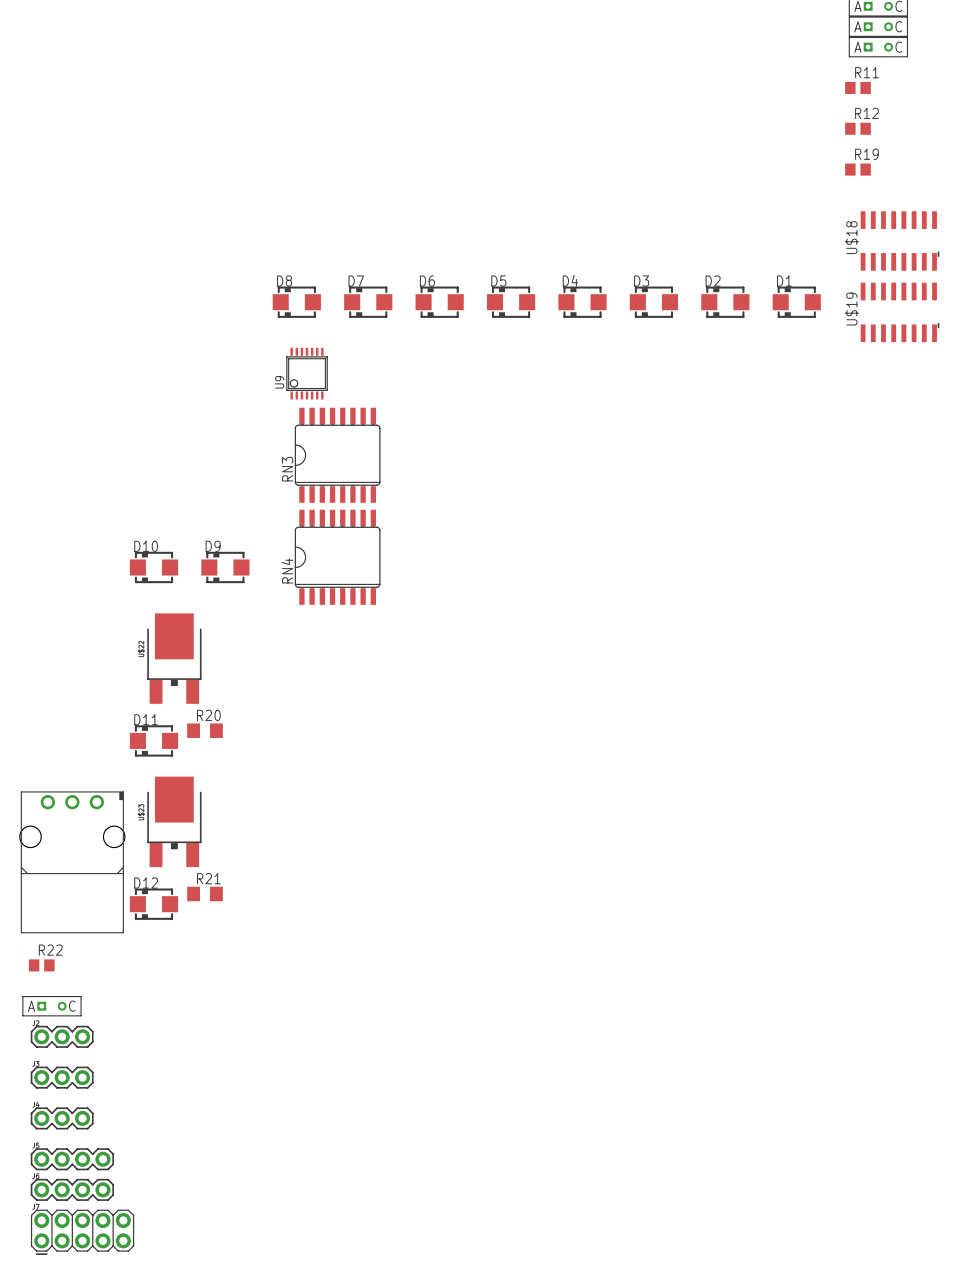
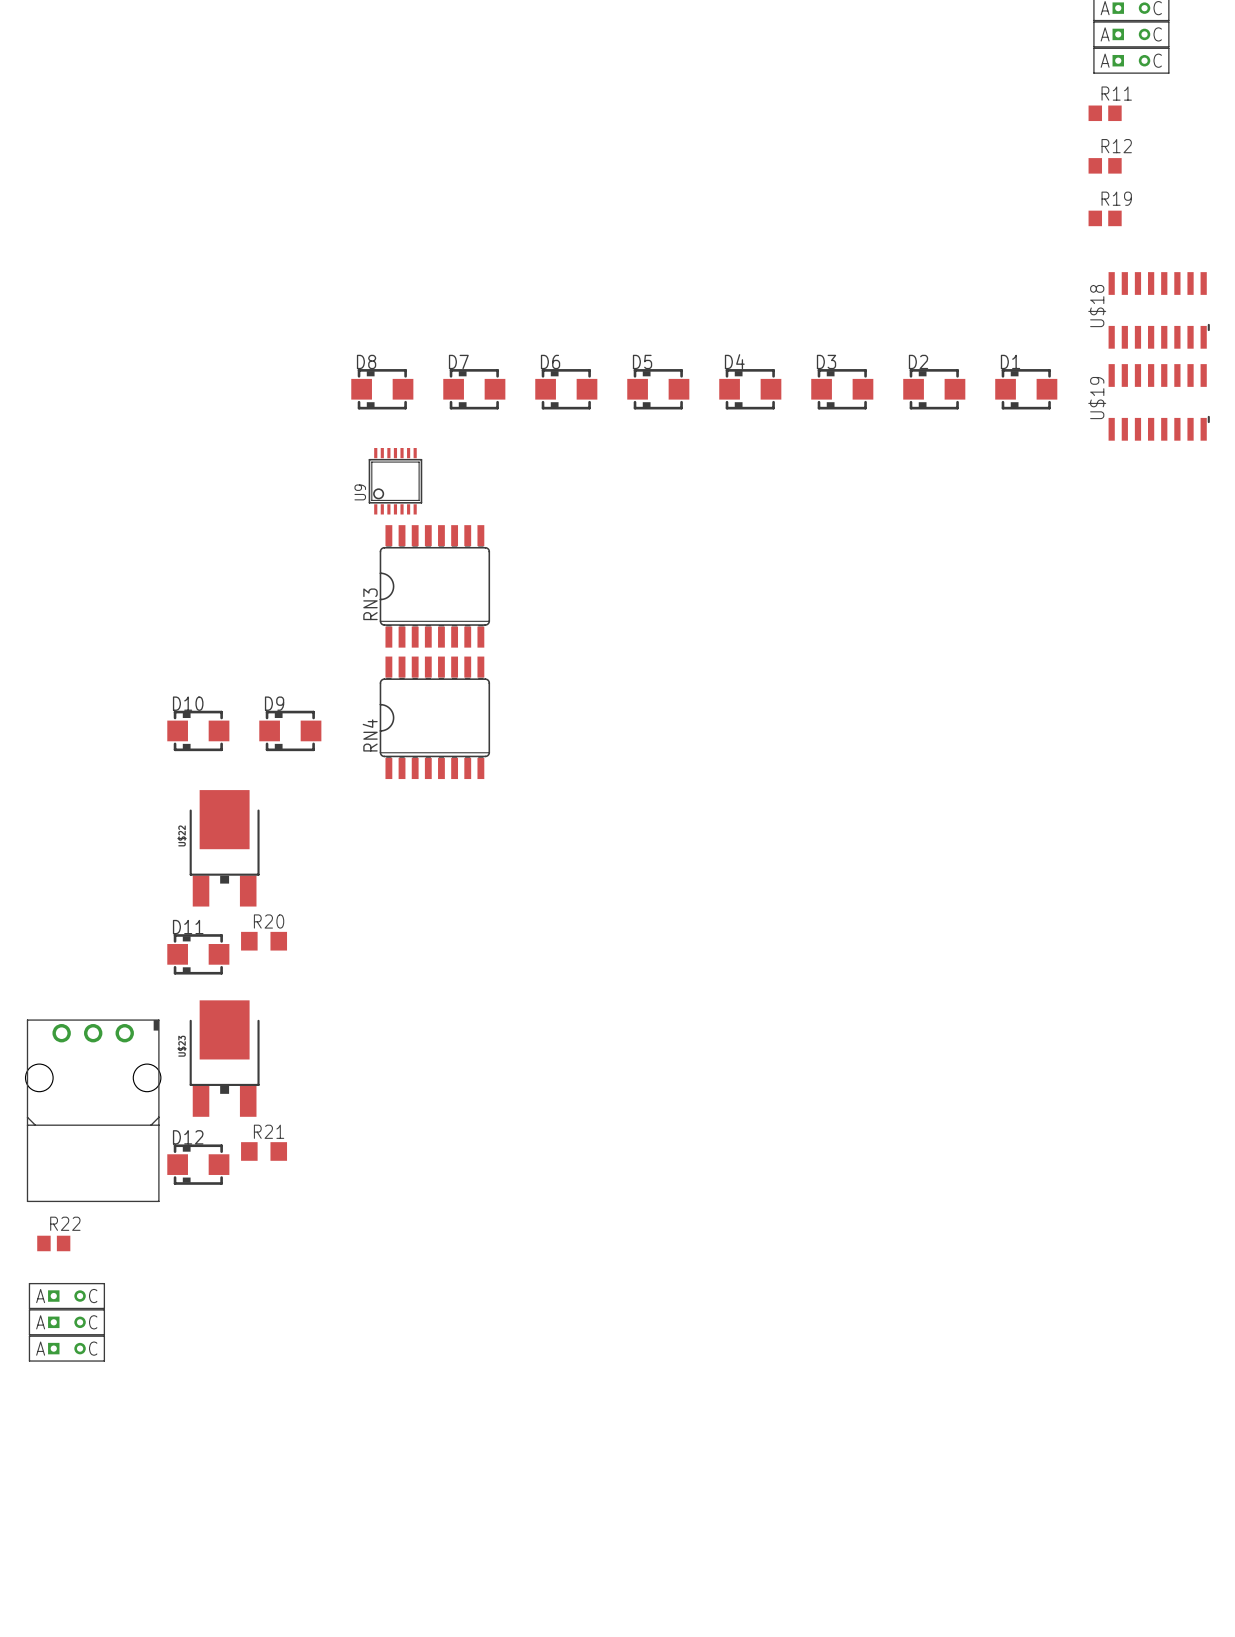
part: none -> (66, 1322)
part: (62, 1036) -> none
part: none -> (66, 1348)
part: (62, 1077) -> none
part: (62, 1118) -> none
part: (72, 1159) -> none
part: (72, 1189) -> none
part: (82, 1232) -> none

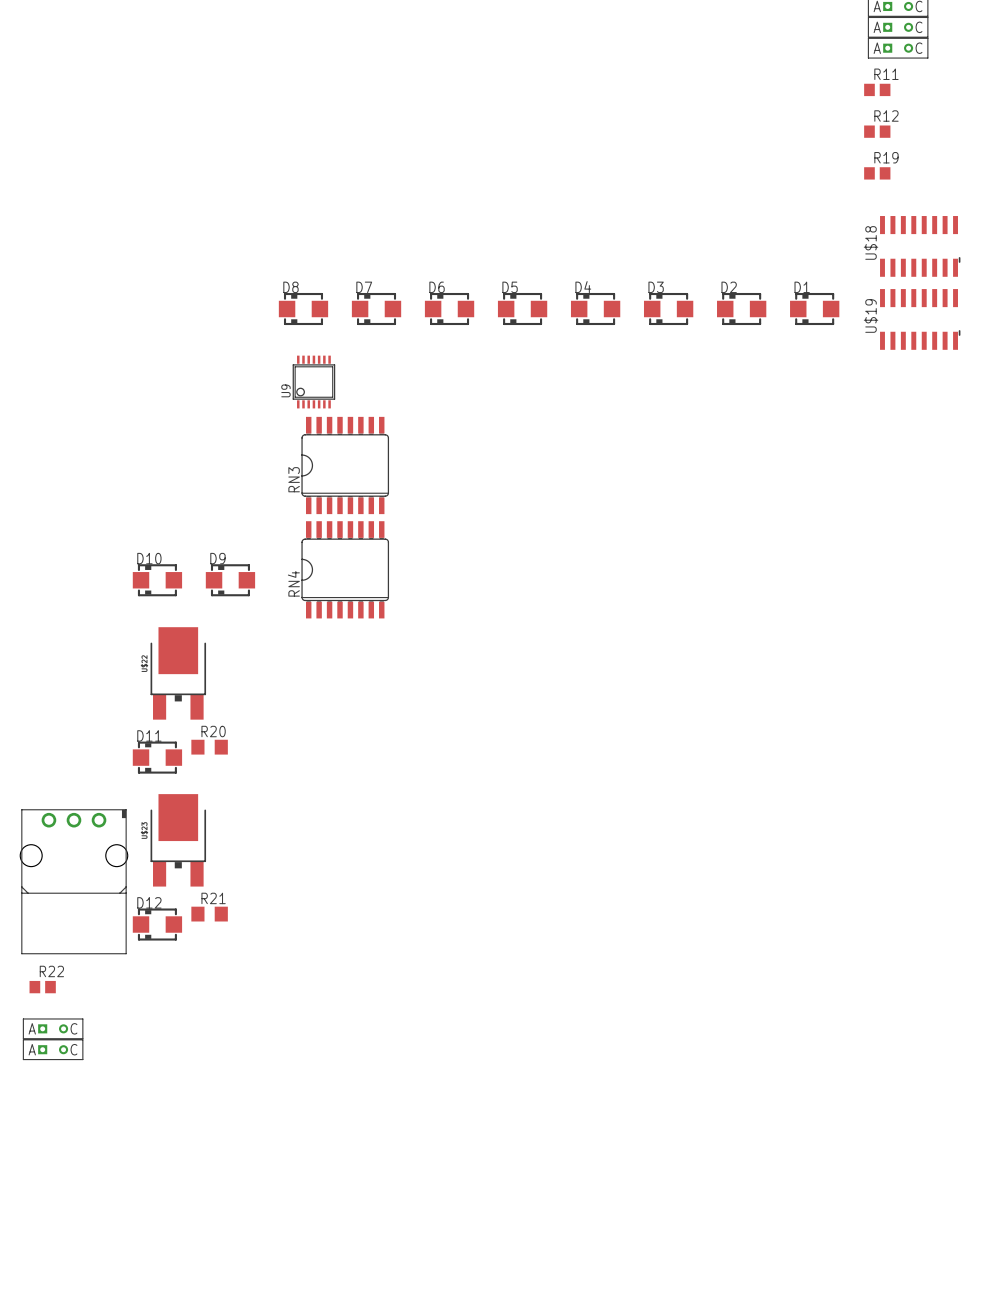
part: (66, 1348) -> none

